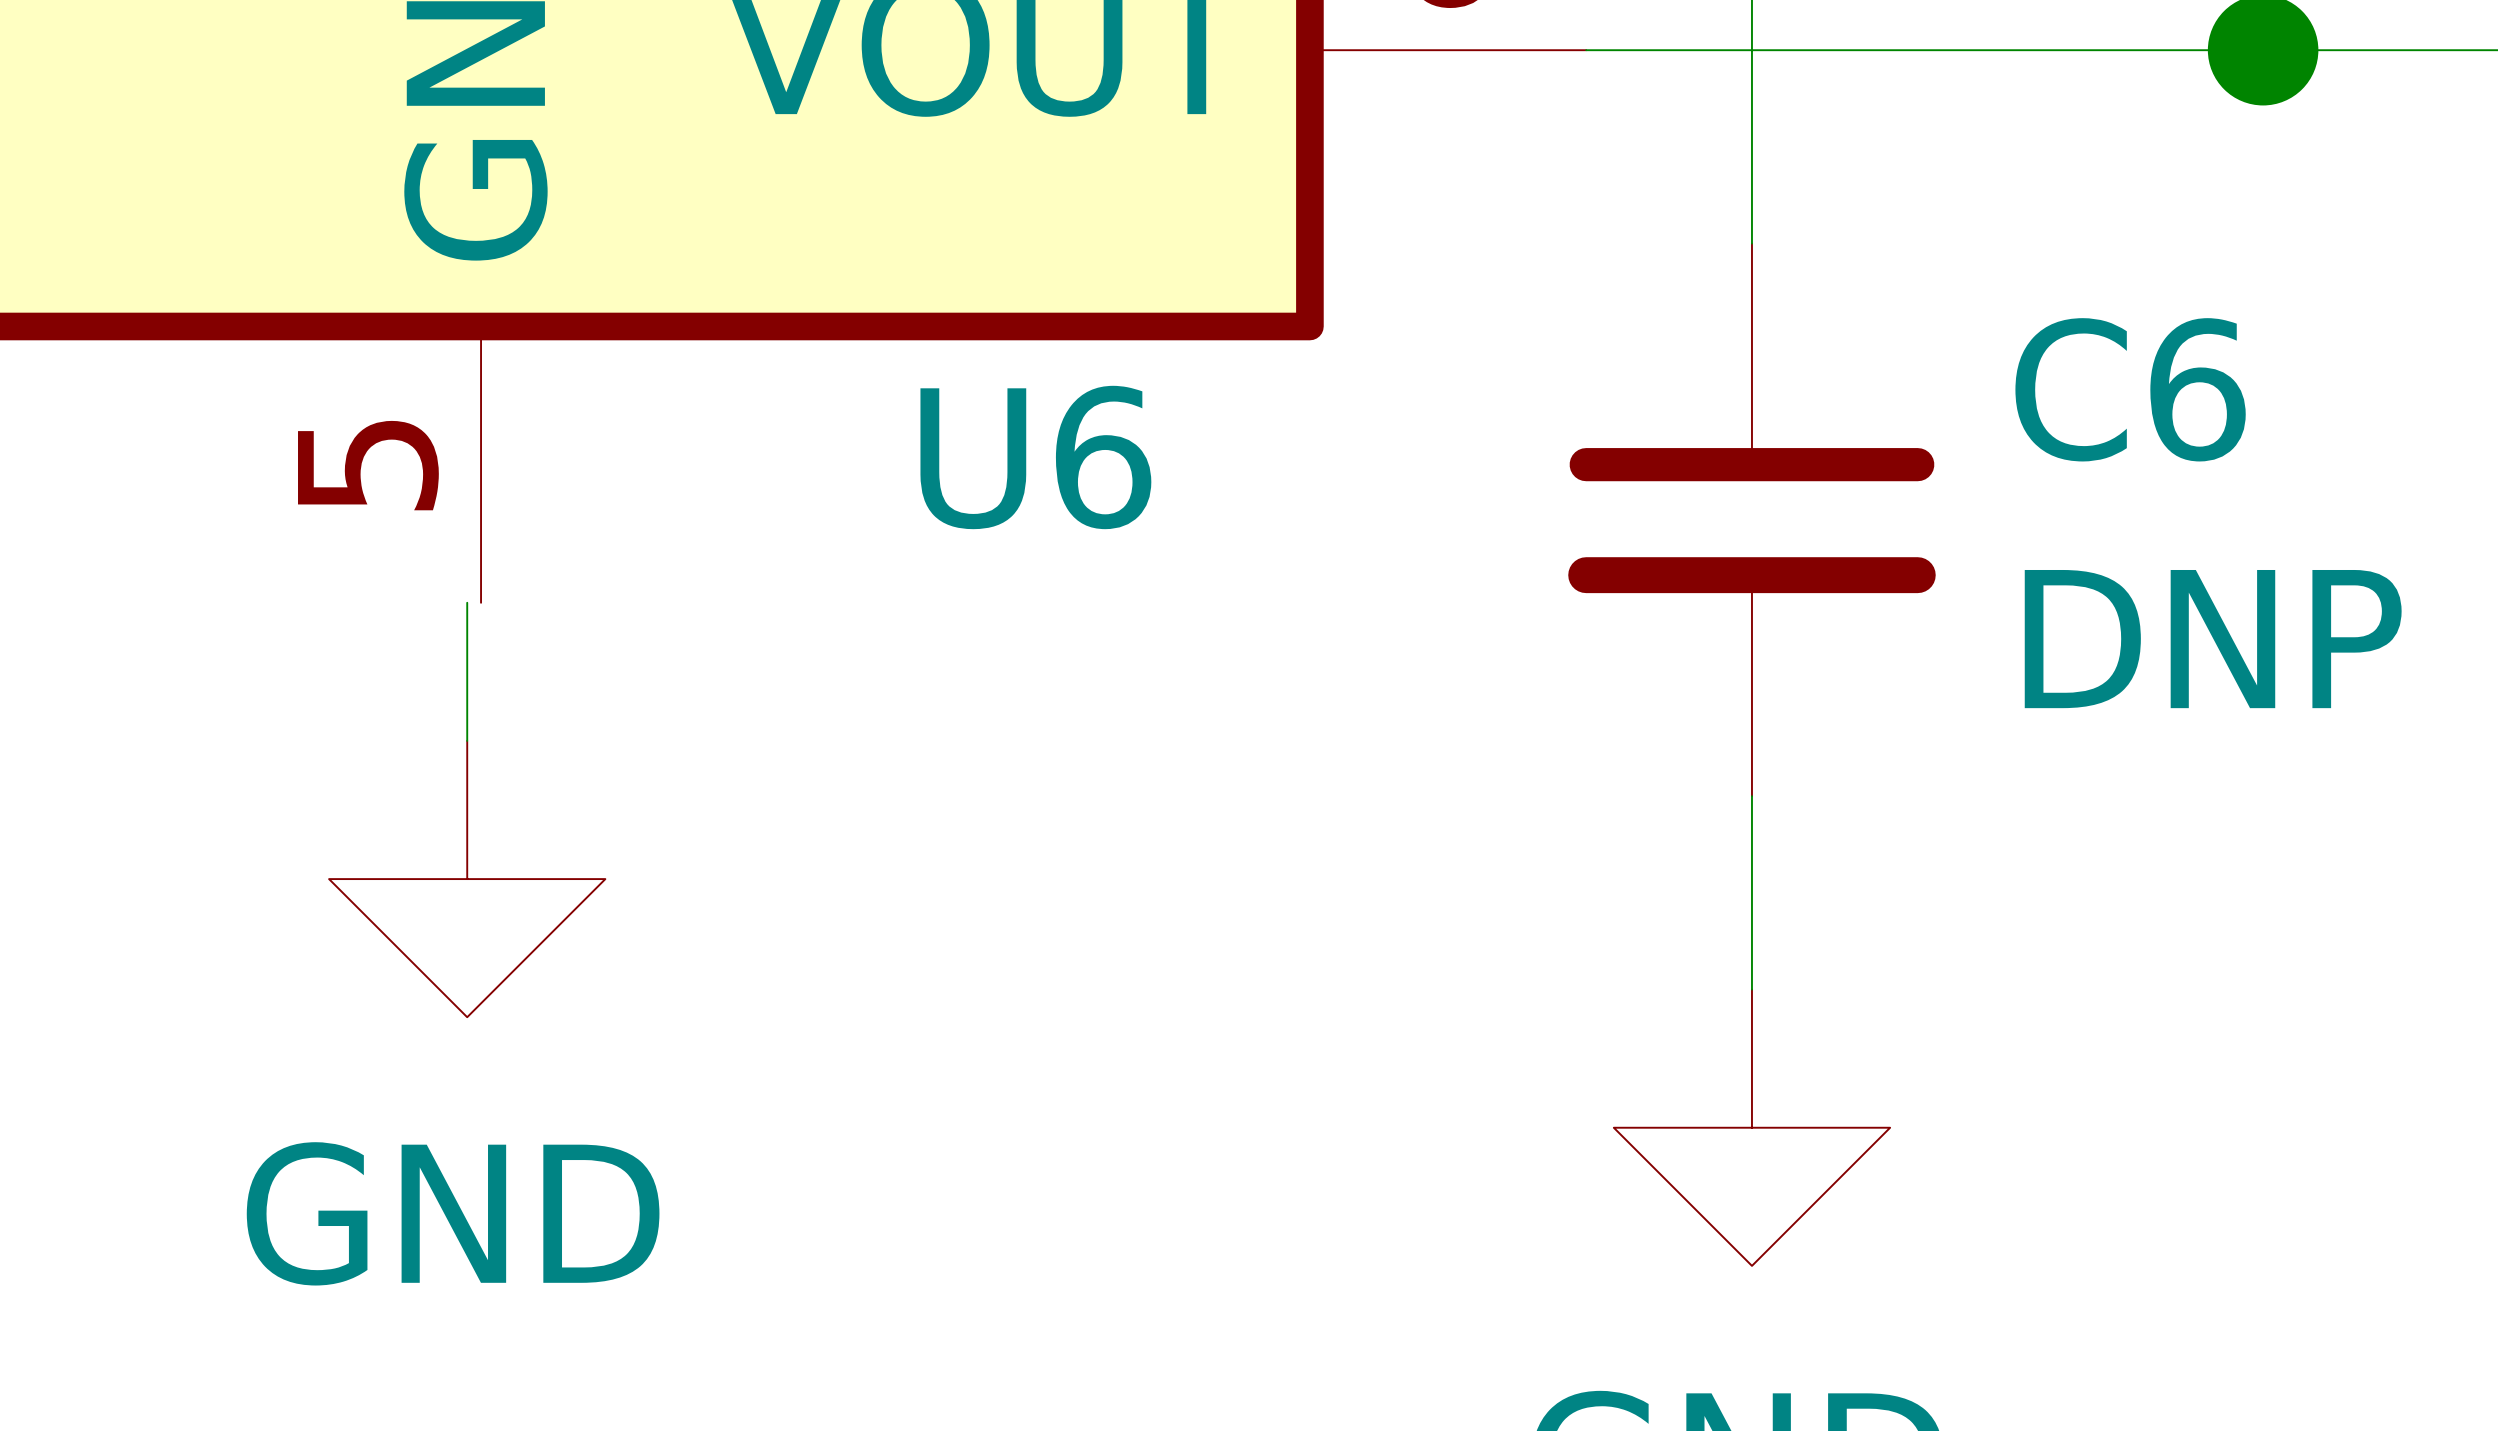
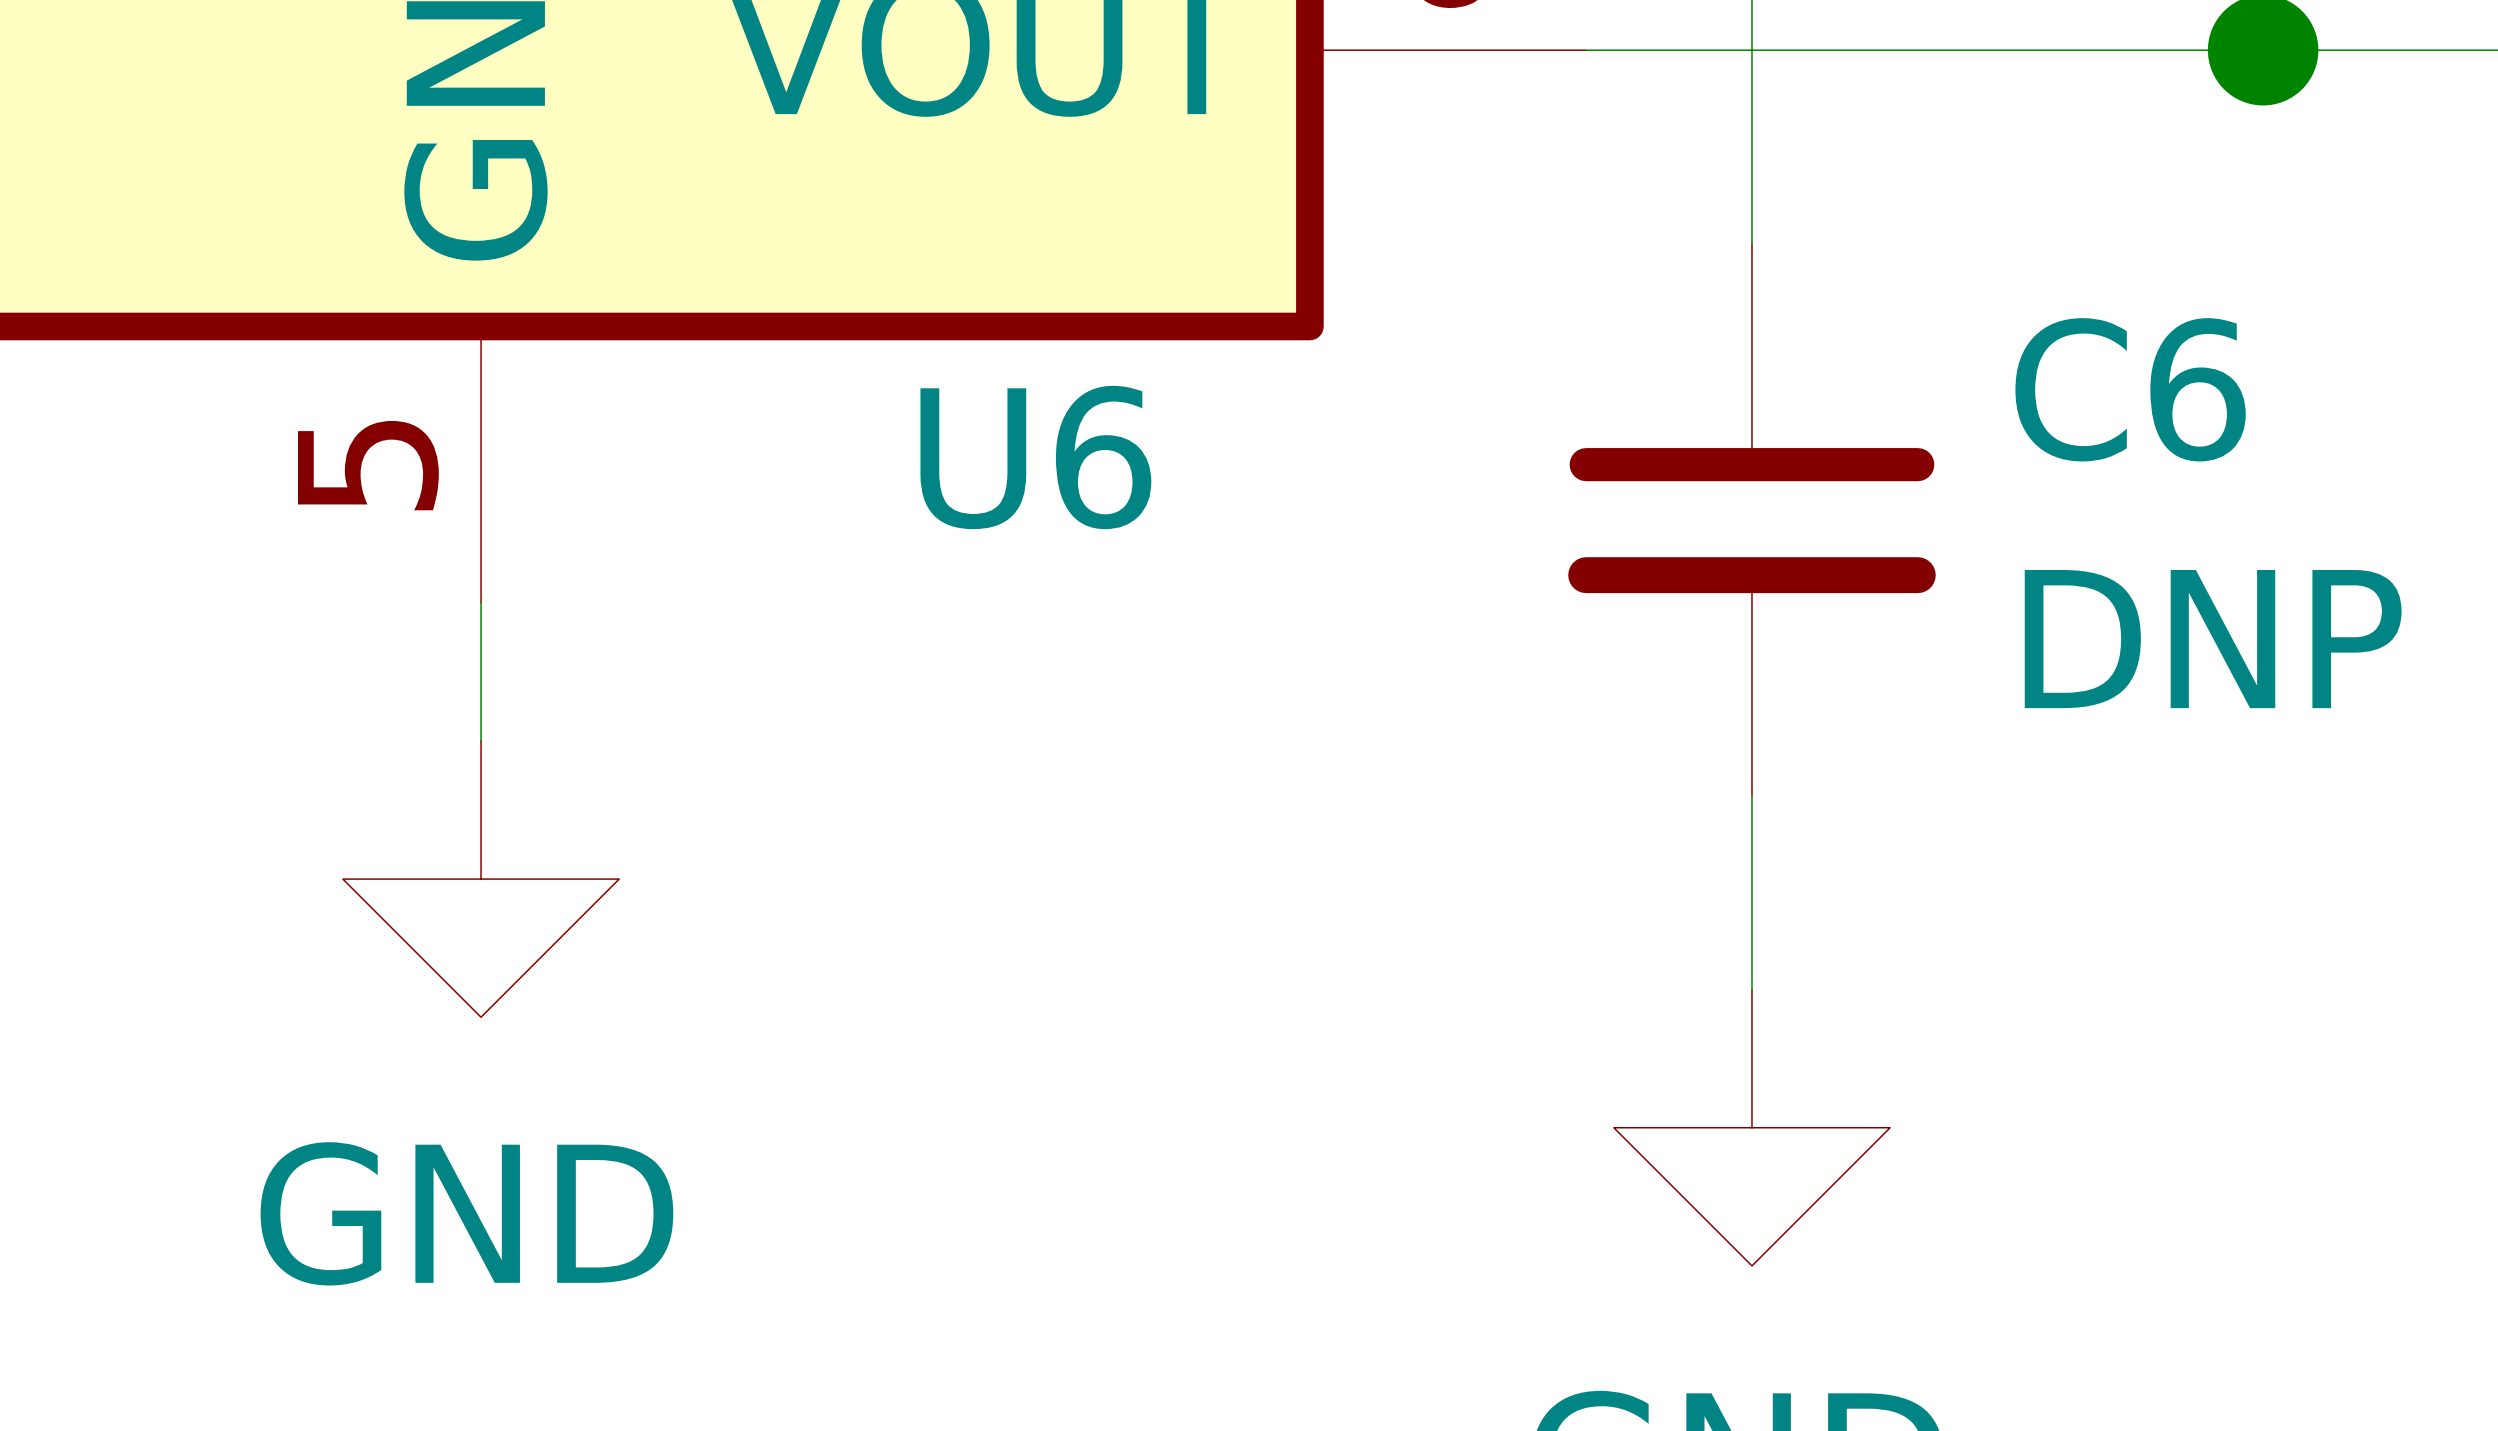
wire: (467, 602) (467, 740) -> (481, 602) (481, 740)
power symbol position: GND (467, 879) -> GND (481, 879)

